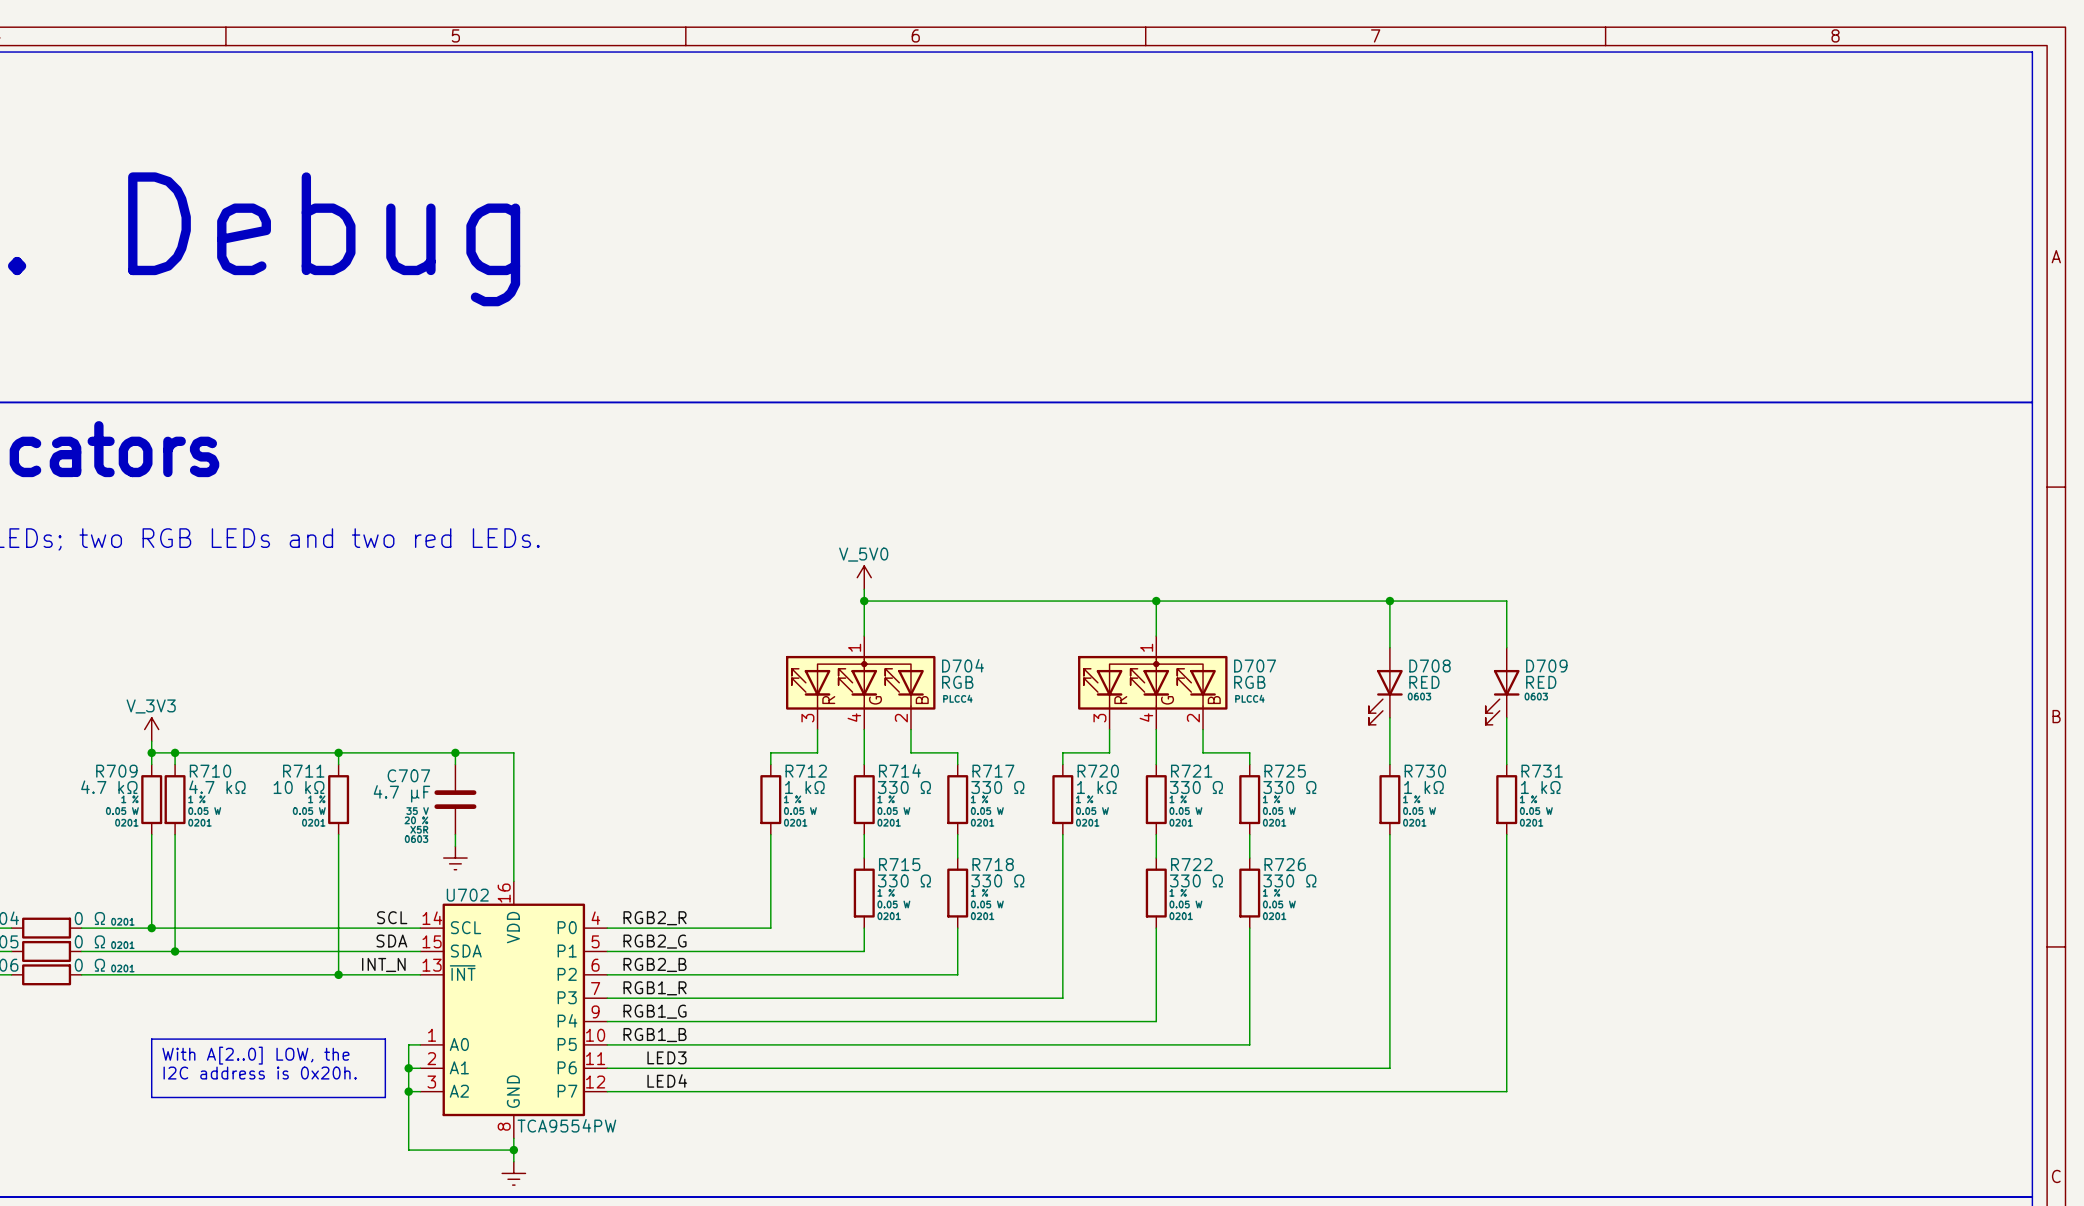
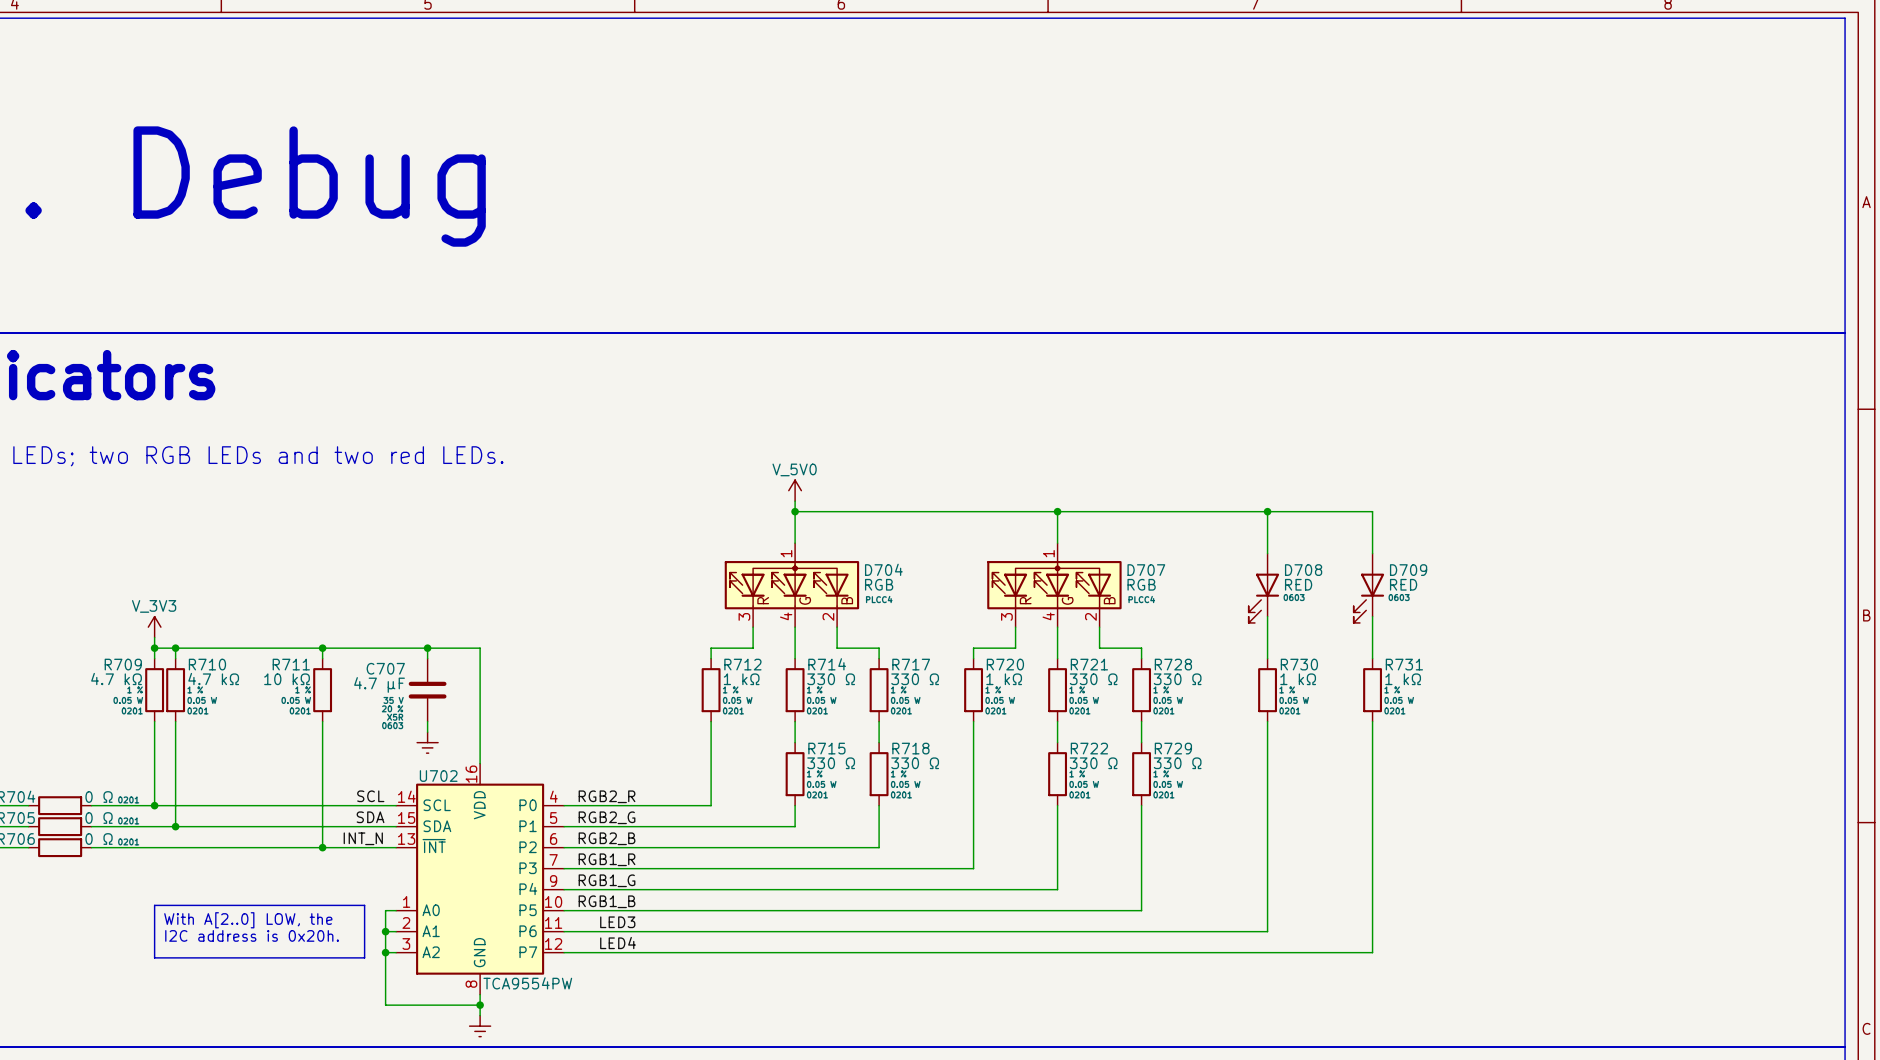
R725 name: R725 (1285, 771) -> R728 (1173, 664)
R726 name: R726 (1285, 864) -> R729 (1173, 748)

